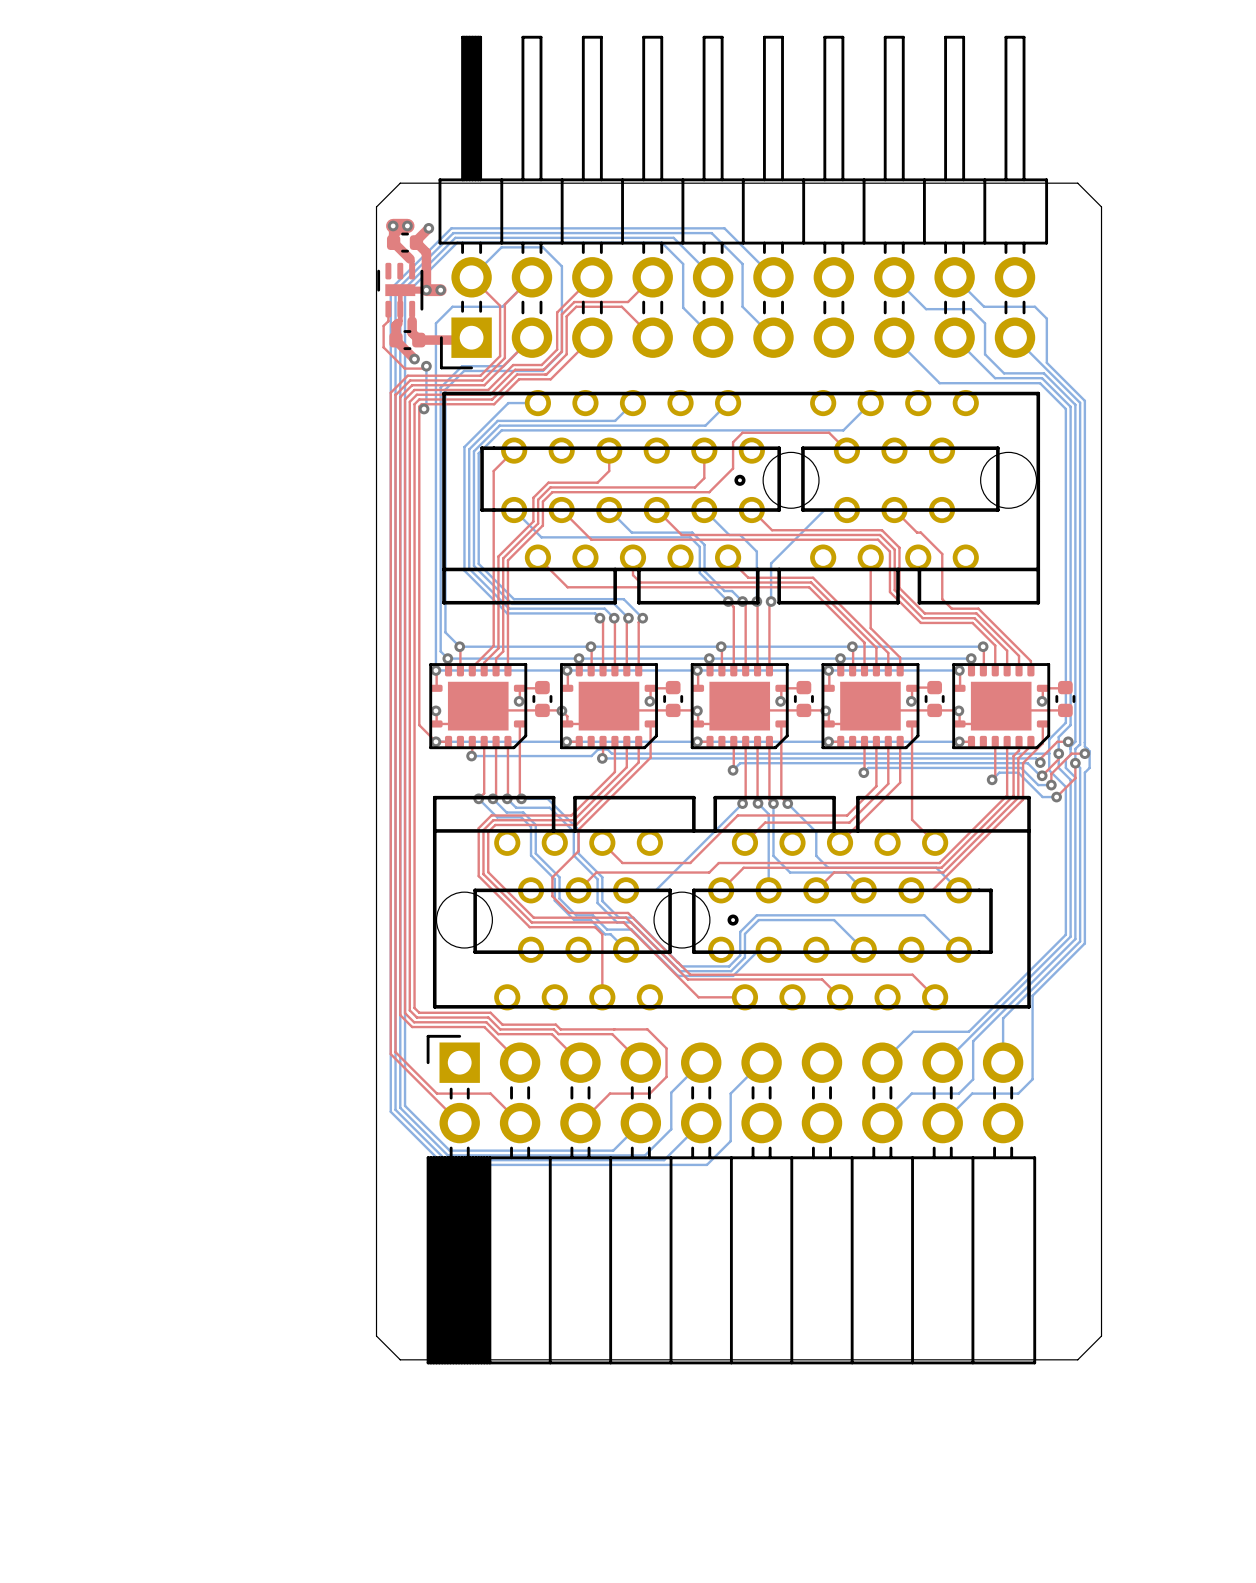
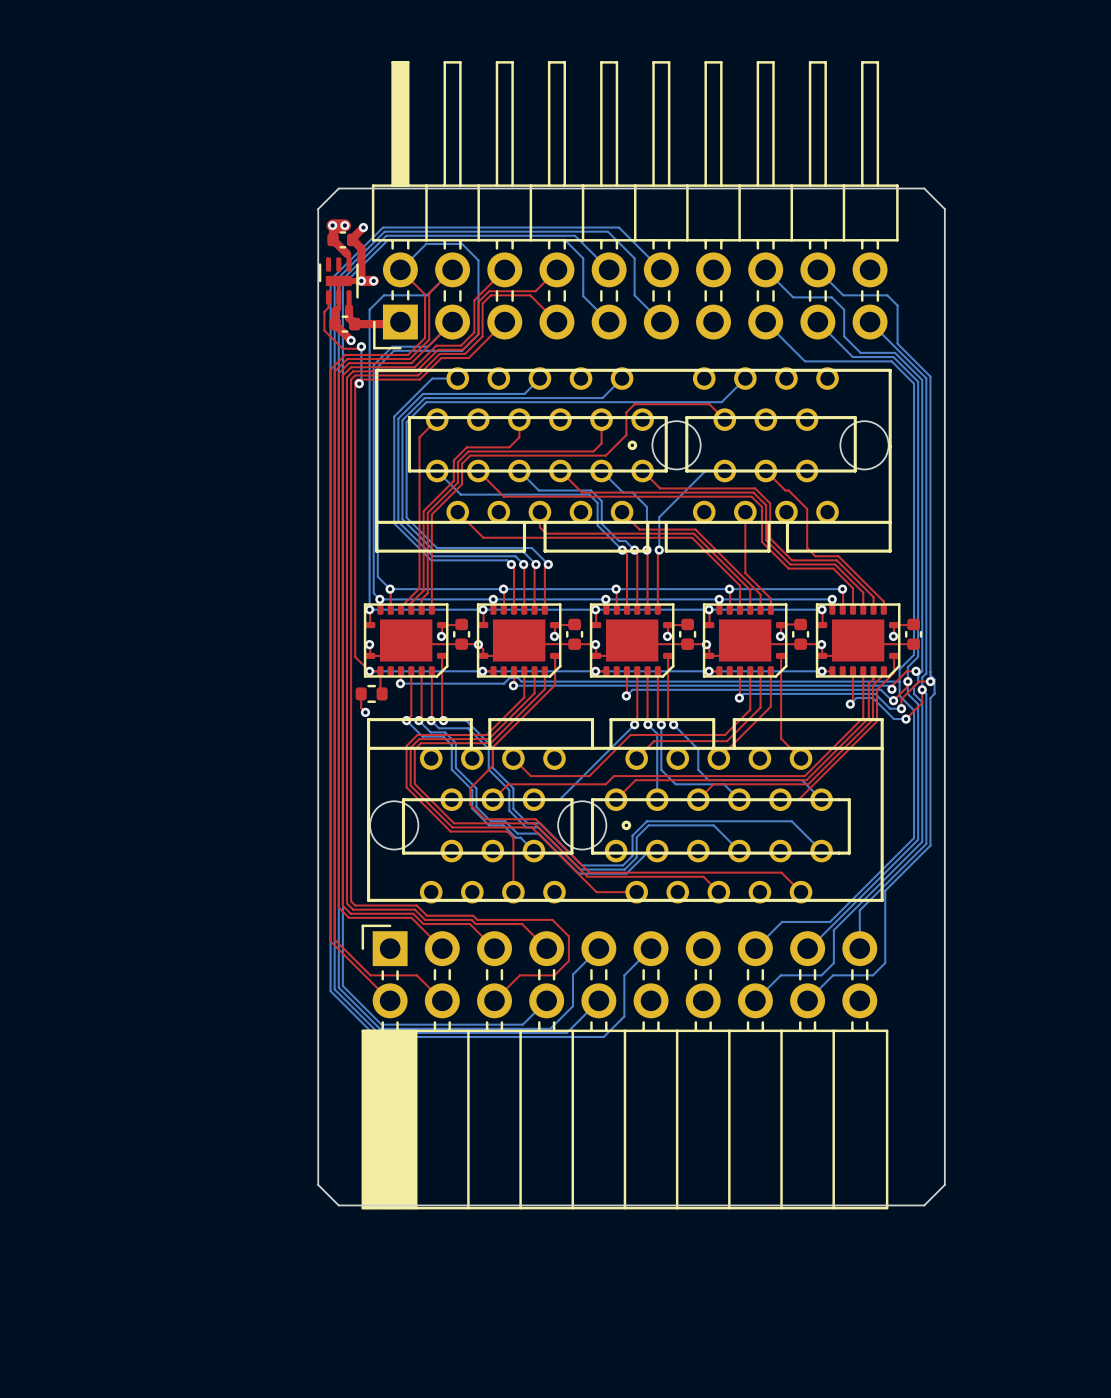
top track: none -> (380, 671) (380, 692) (382, 693)
top track: none -> (361, 693) (361, 708) (365, 712)
part: none -> (371, 693)
via: none -> (365, 712)

